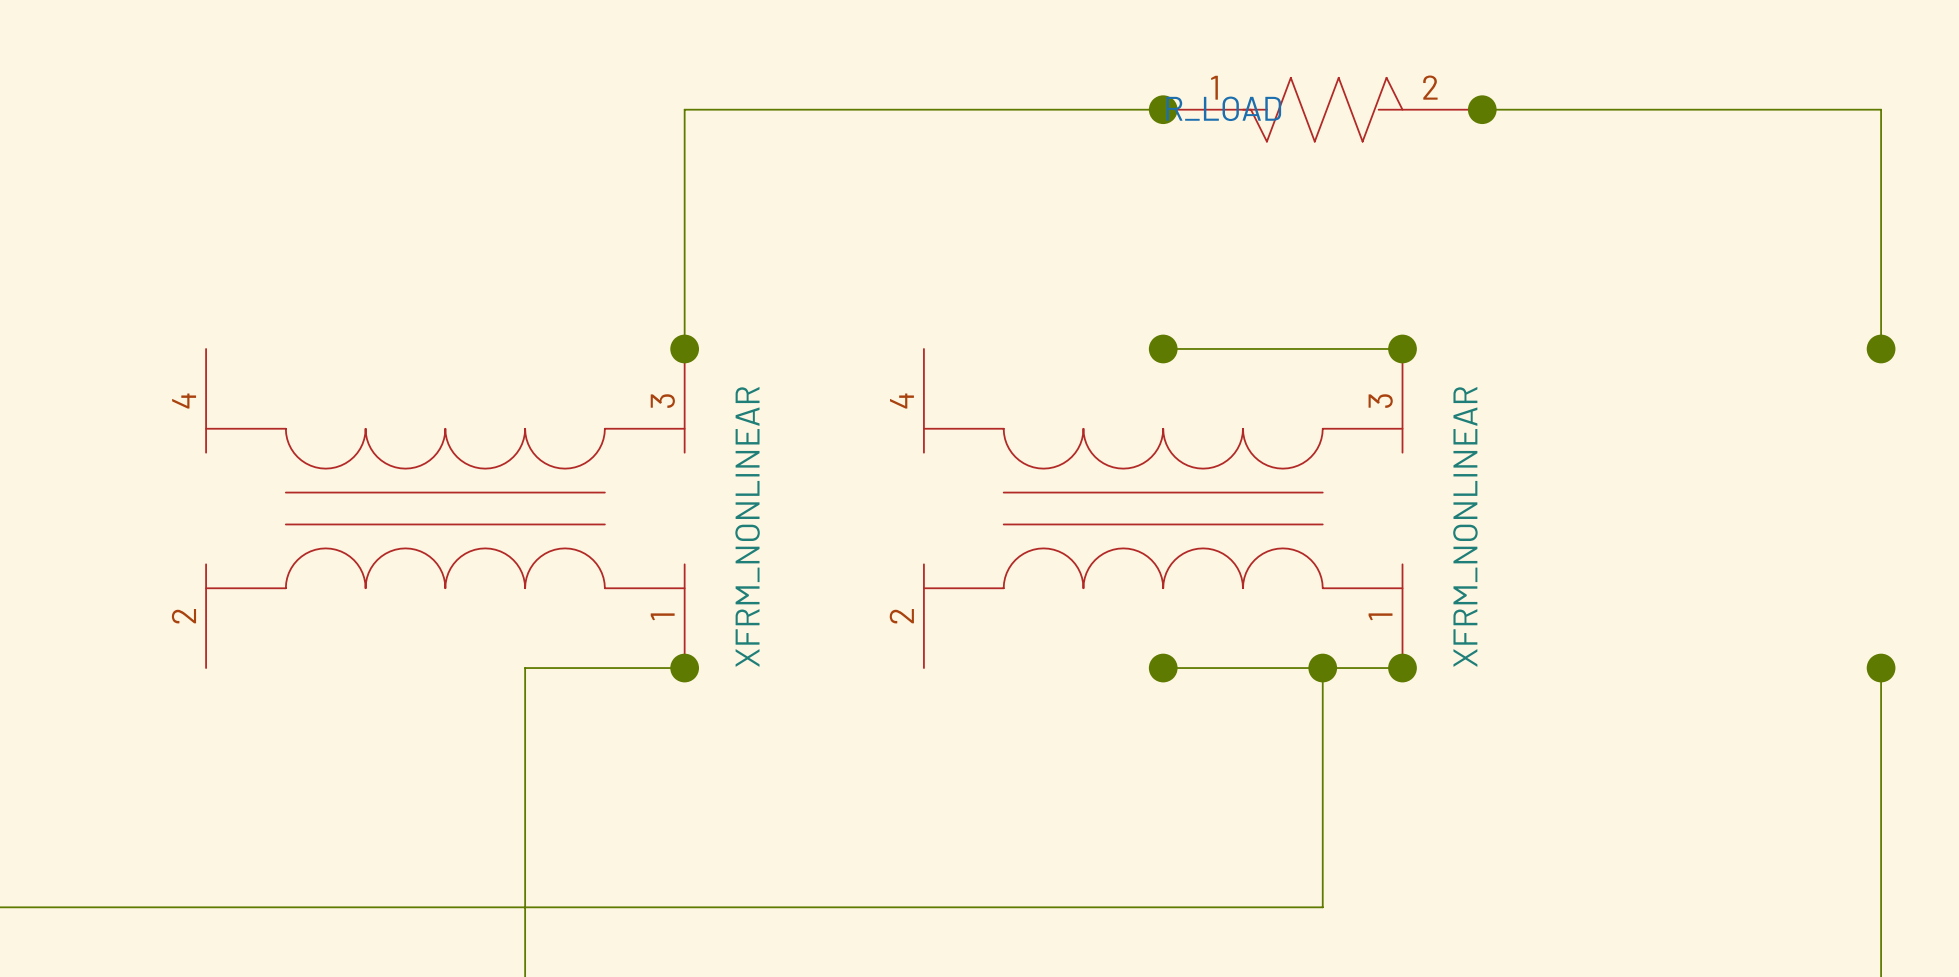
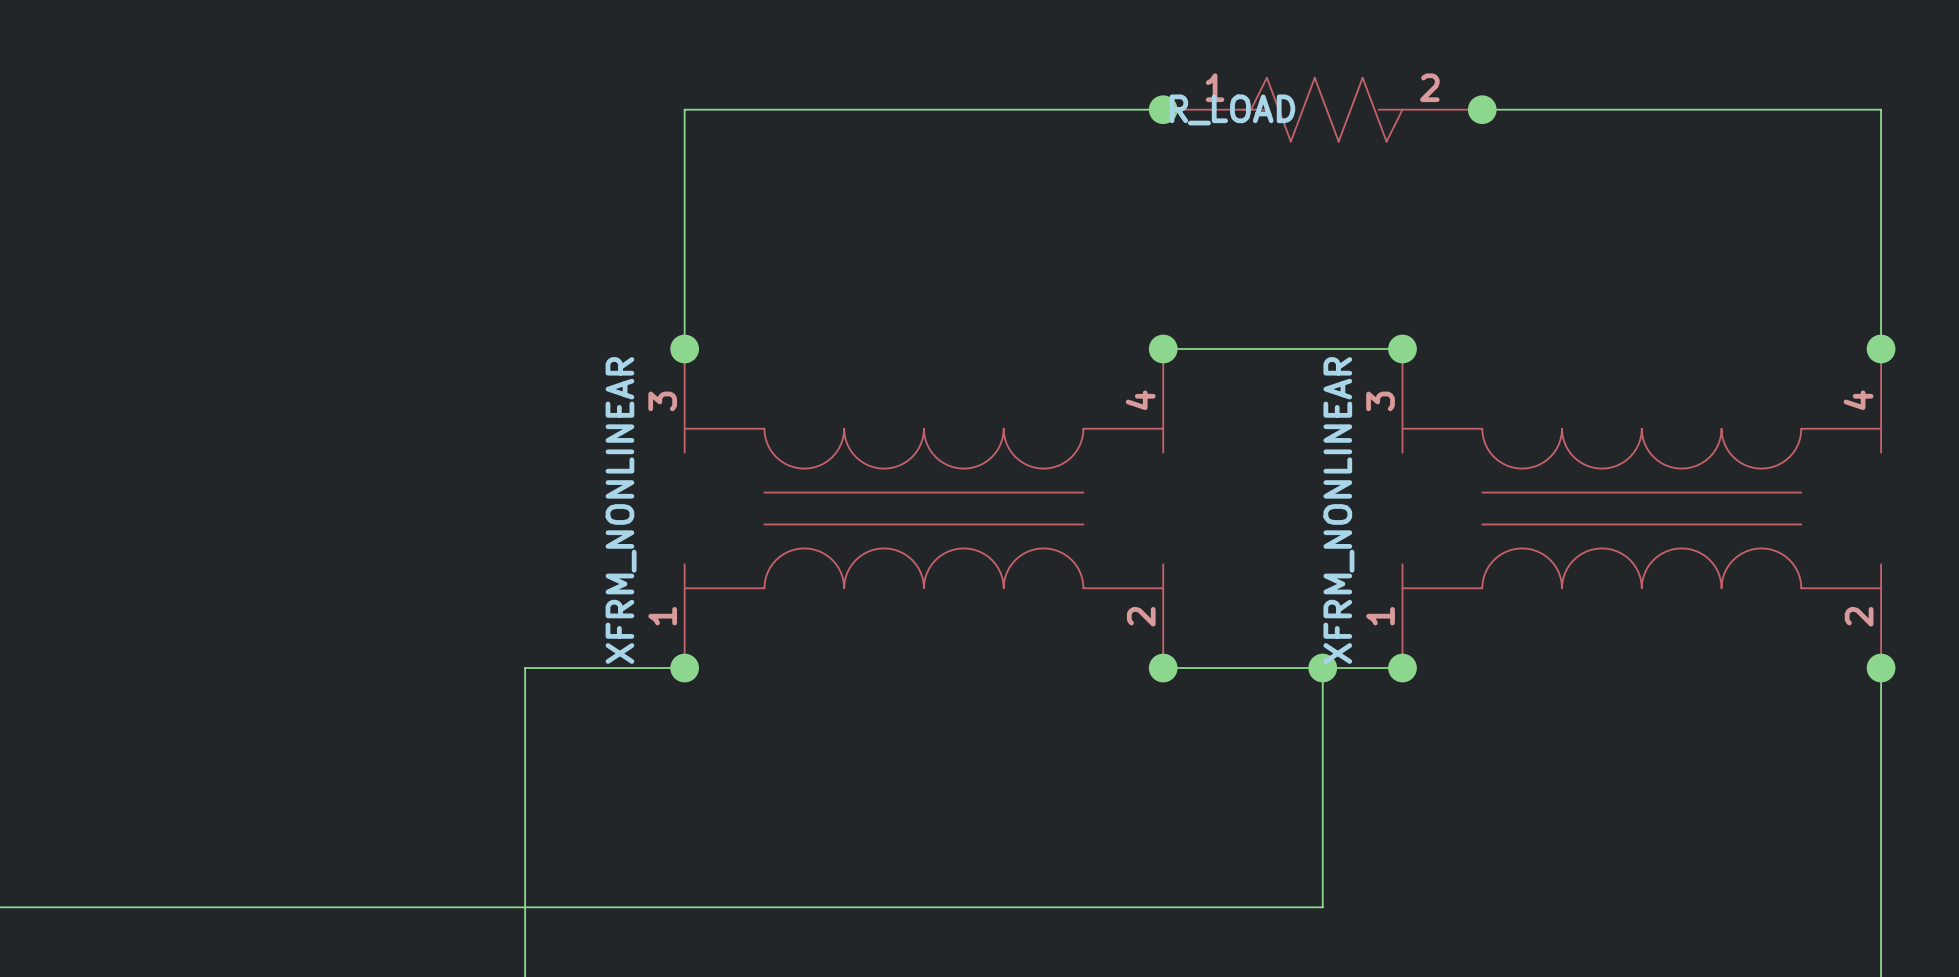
R_LOAD flip: as is (1322, 109) -> up-down (1322, 109)
part: XFRM_NONLINEAR (445, 508) -> none
part: none -> XFRM_NONLINEAR (923, 508)
part: XFRM_NONLINEAR (1163, 508) -> none
part: none -> XFRM_NONLINEAR (1641, 508)

